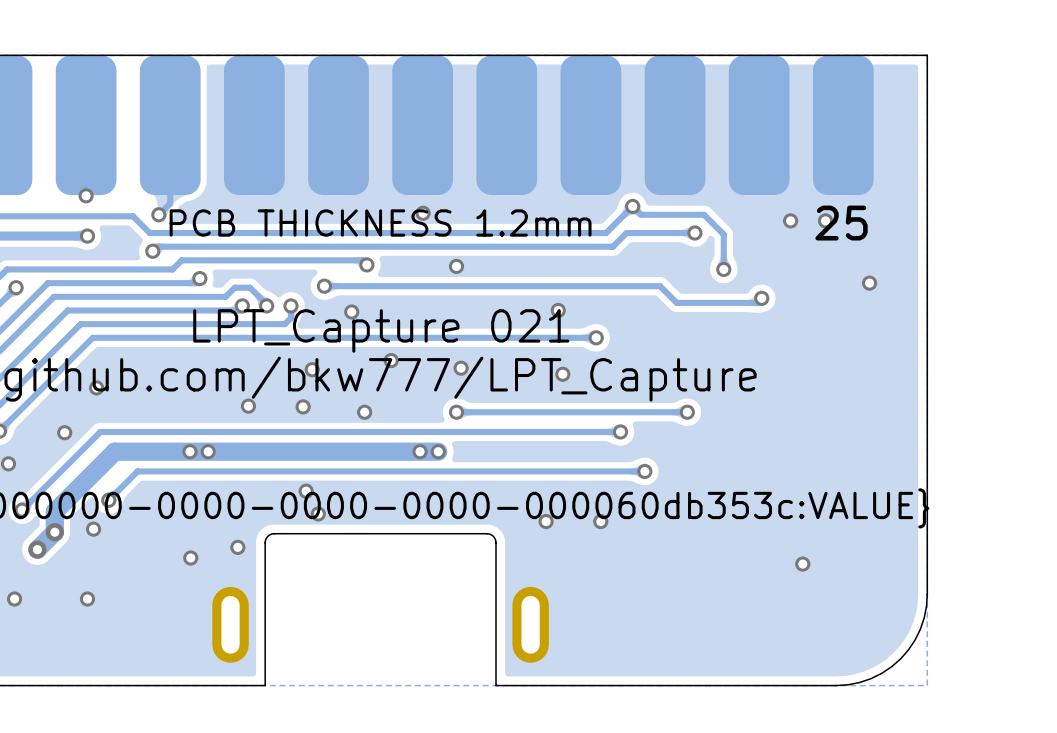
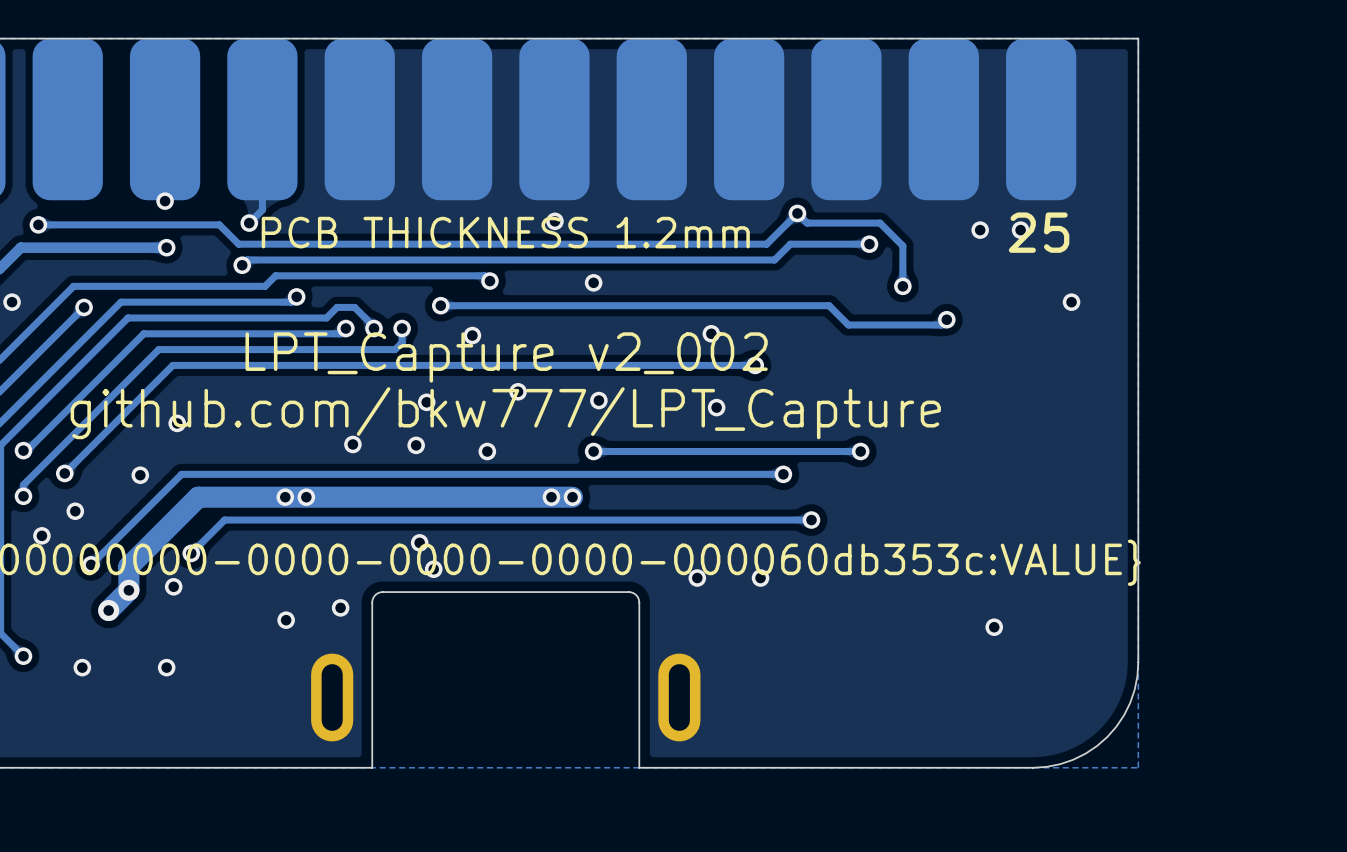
text: LPT_Capture 021 (381, 330) -> LPT_Capture v2_002 (506, 357)

